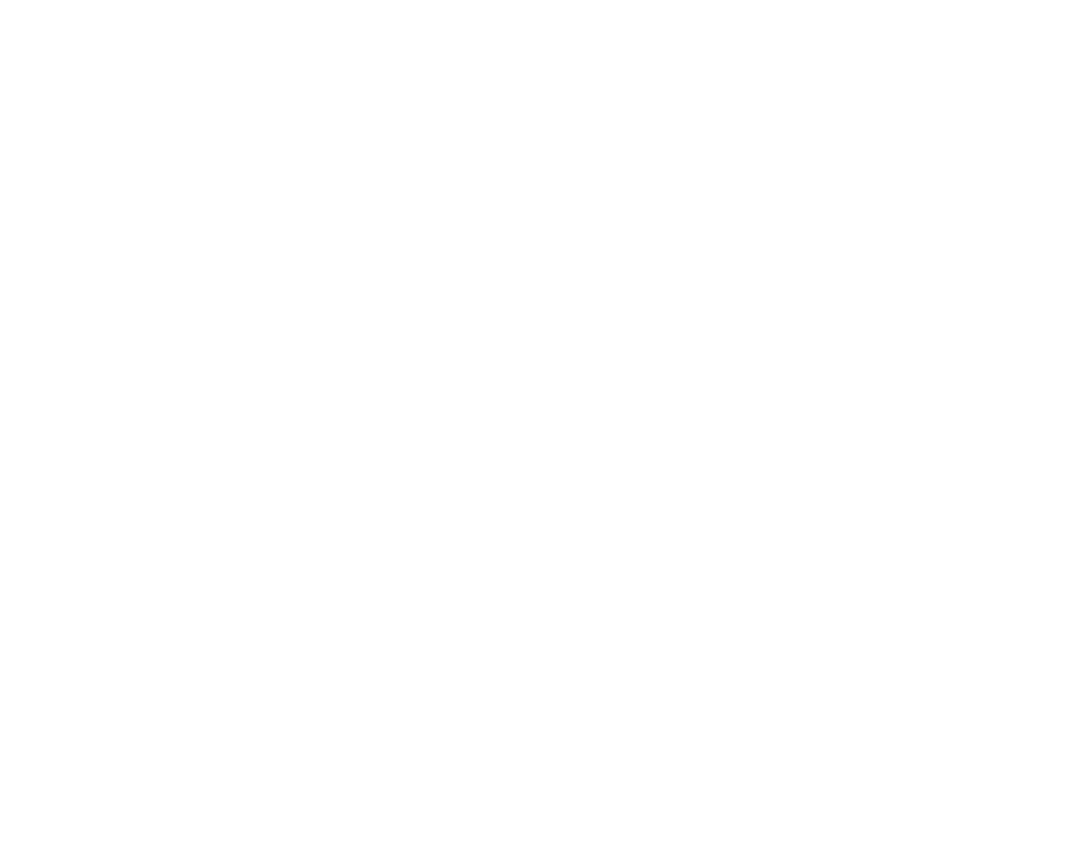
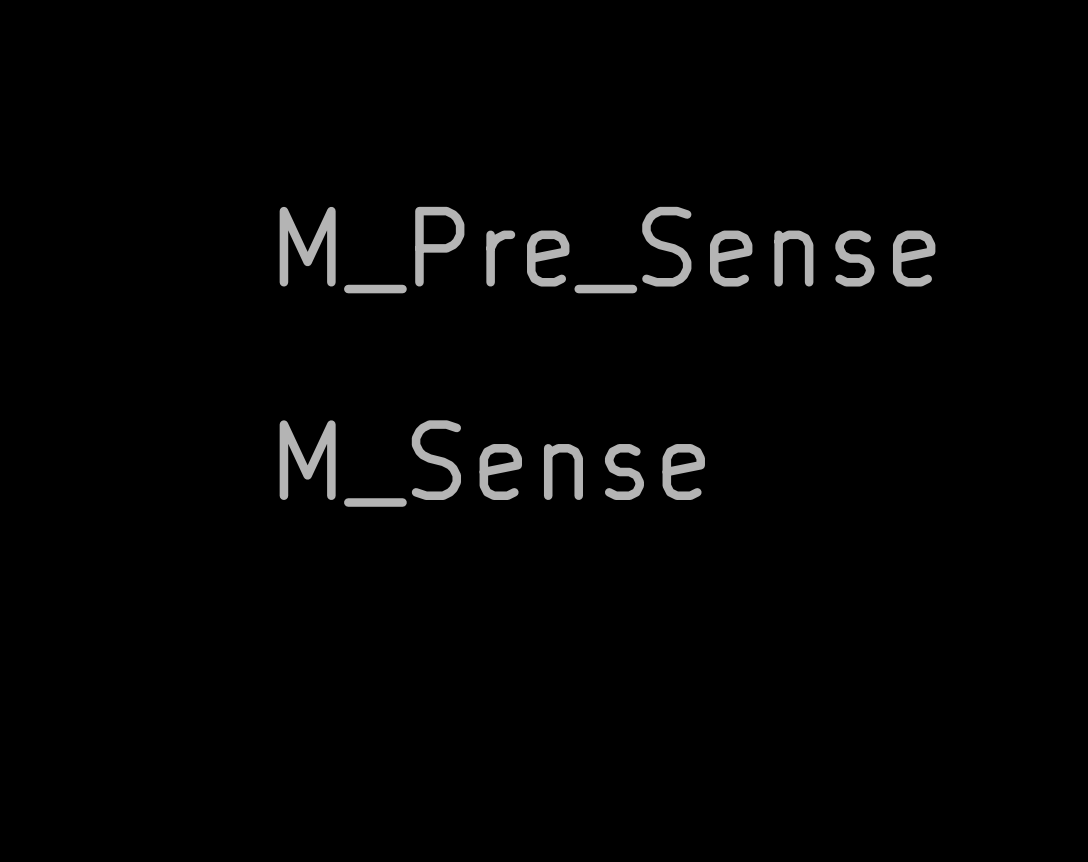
label: none -> M_Pre_Sense (607, 250)
label: none -> M_Sense (492, 463)

